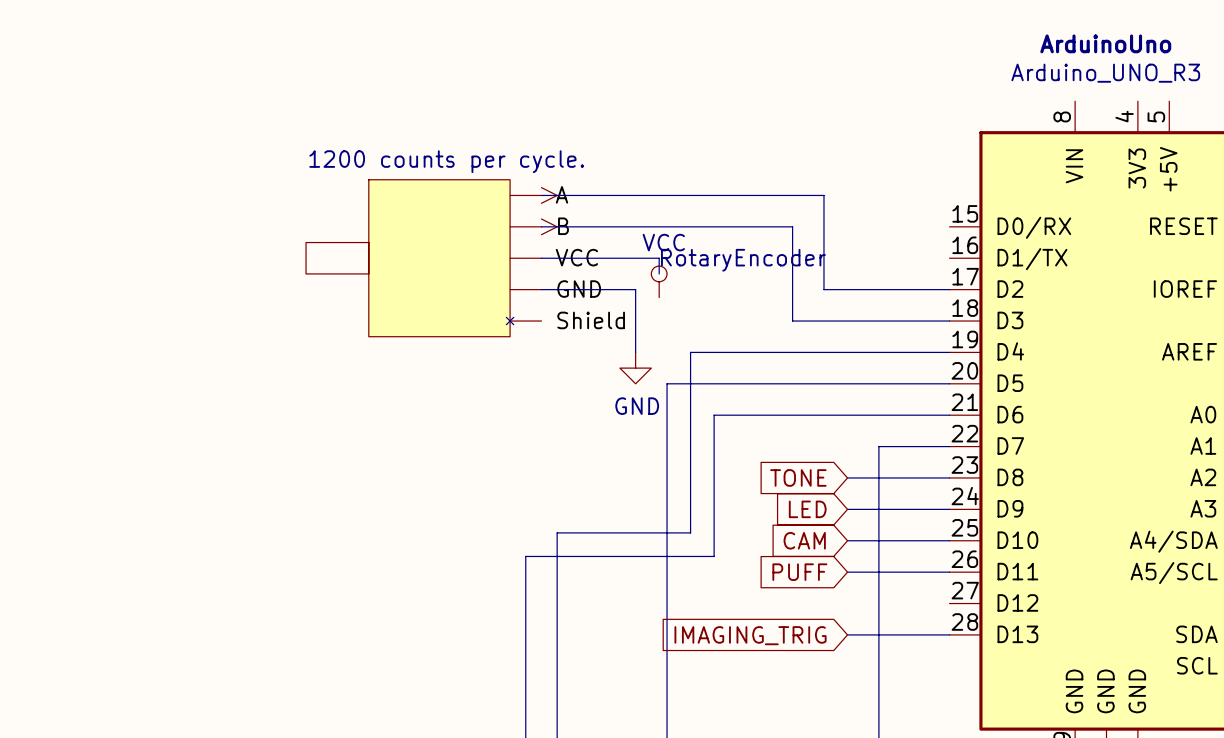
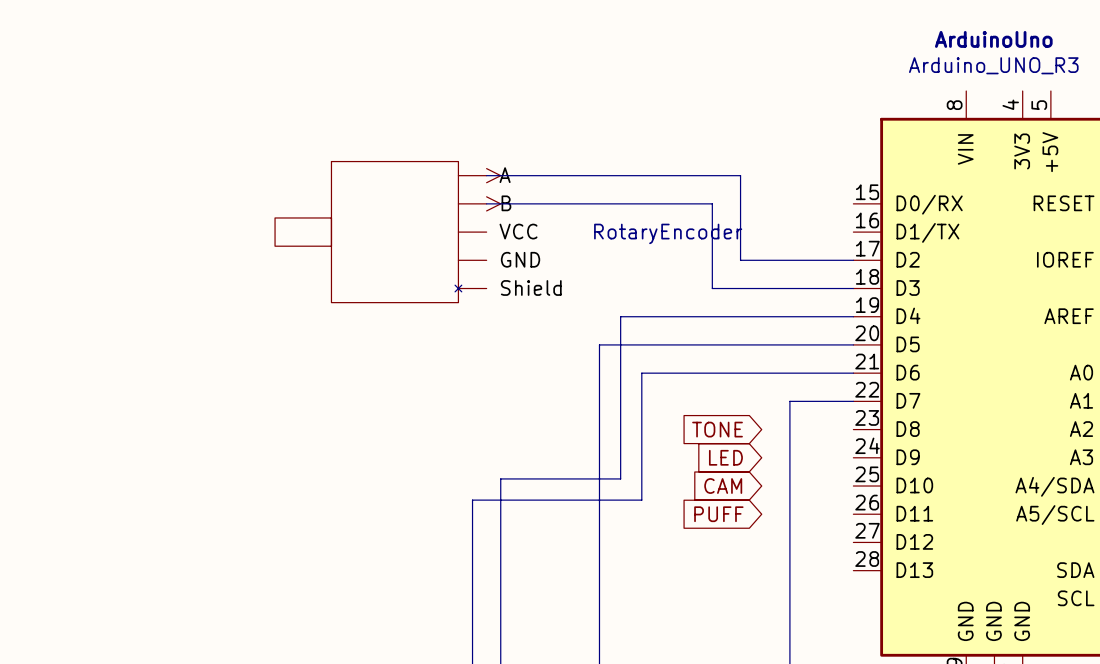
text: 1200 counts per cycle. (446, 161) -> none
part symbol: [306, 179, 558, 337] -> [275, 161, 501, 303]
wire: (541, 258) (659, 258) (659, 273) -> none
power symbol: VCC (659, 281) -> none
wire: (541, 289) (635, 289) (635, 352) -> none
power symbol: GND (635, 368) -> none
wire: (847, 477) (949, 477) -> none
wire: (847, 509) (949, 509) -> none
wire: (847, 540) (949, 540) -> none
wire: (847, 572) (949, 572) -> none
wire: (847, 634) (949, 634) -> none
global label: IMAGING_TRIG (750, 635) -> none

